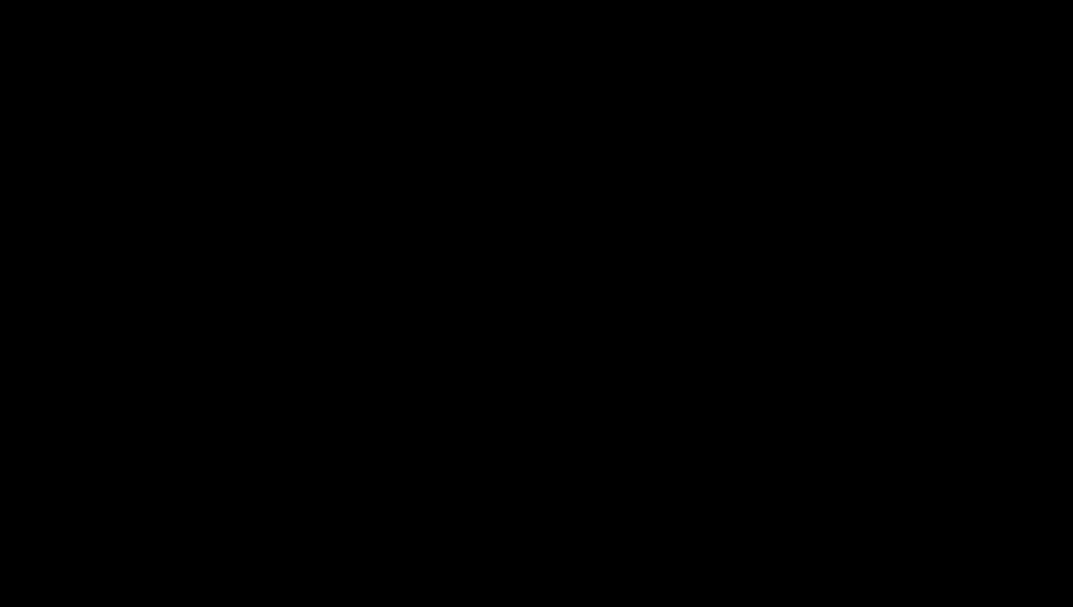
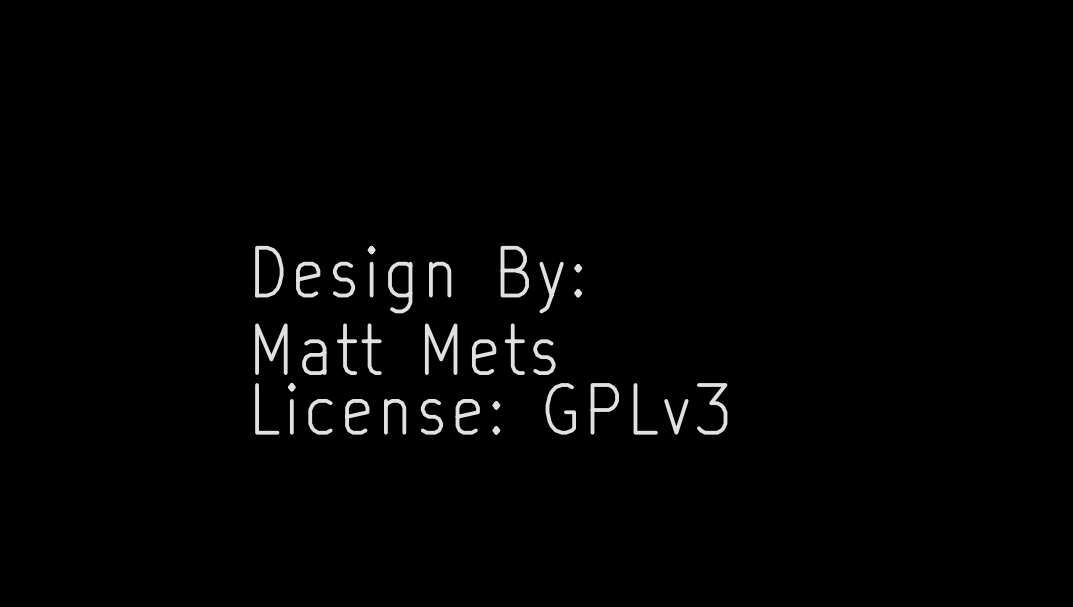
text: none -> Design By: (418, 279)
text: none -> Matt Mets (405, 349)
text: none -> License: GPLv3 (491, 408)

